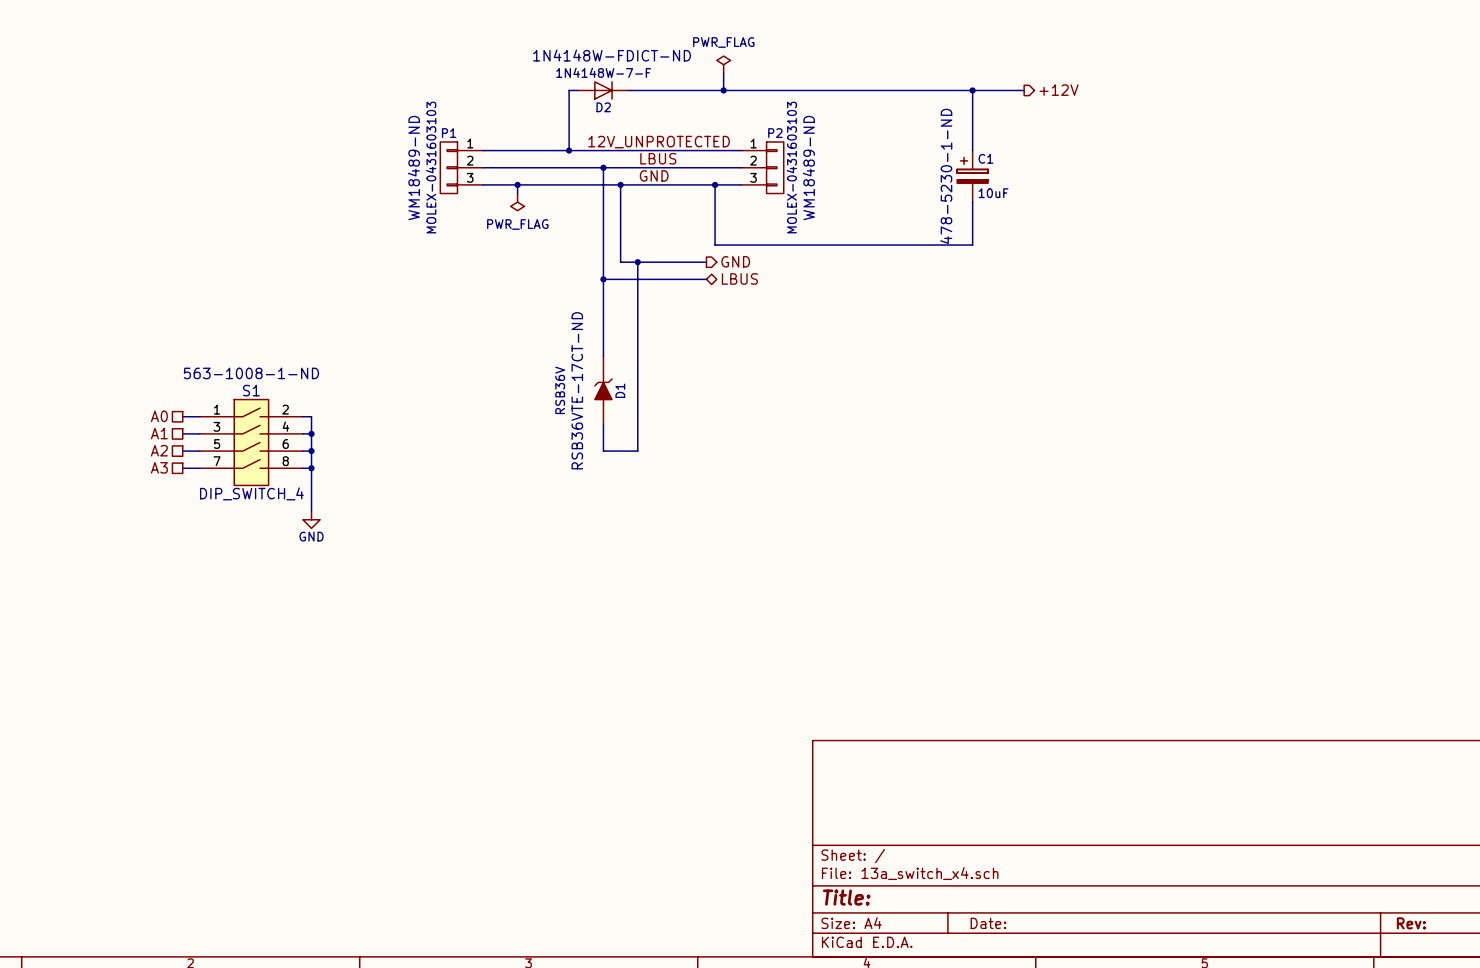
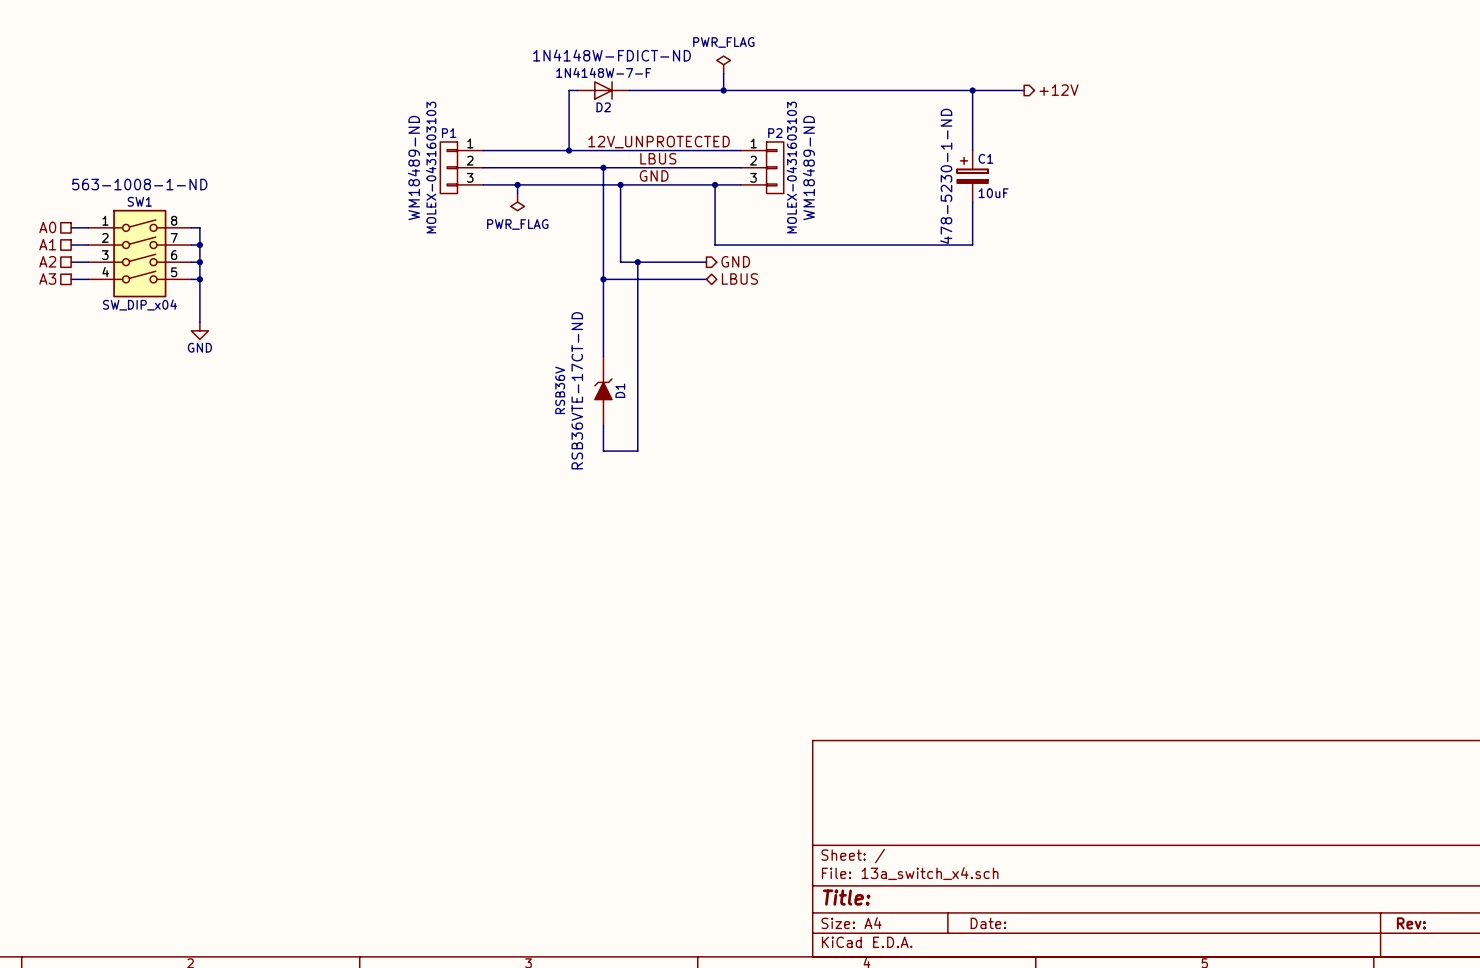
hierarchical label: none -> A0 (47, 227)
wire: none -> (71, 227) (88, 227)
wire: none -> (191, 227) (199, 227) (199, 322)
hierarchical label: none -> A1 (47, 244)
wire: none -> (71, 245) (88, 245)
wire: none -> (191, 245) (199, 245)
junction: none -> (199, 245)
SW1: none -> SW_DIP_x04 (139, 253)
hierarchical label: none -> A2 (47, 261)
wire: none -> (71, 262) (88, 262)
wire: none -> (191, 262) (199, 262)
junction: none -> (199, 262)
hierarchical label: none -> A3 (47, 278)
wire: none -> (71, 279) (88, 279)
wire: none -> (191, 279) (199, 279)
junction: none -> (199, 279)
power symbol: none -> GND (199, 330)
hierarchical label: A0 (159, 416) -> none
wire: (182, 416) (199, 416) -> none
wire: (302, 416) (311, 416) (311, 511) -> none
hierarchical label: A1 (159, 433) -> none
wire: (182, 433) (199, 433) -> none
wire: (302, 433) (311, 433) -> none
junction: (311, 433) -> none
S1: DIP_SWITCH_4 (251, 442) -> none
hierarchical label: A2 (159, 450) -> none
wire: (182, 451) (199, 451) -> none
wire: (302, 451) (311, 451) -> none
junction: (311, 451) -> none
hierarchical label: A3 (159, 467) -> none
wire: (182, 468) (199, 468) -> none
wire: (302, 468) (311, 468) -> none
junction: (311, 468) -> none
power symbol: GND (311, 519) -> none

